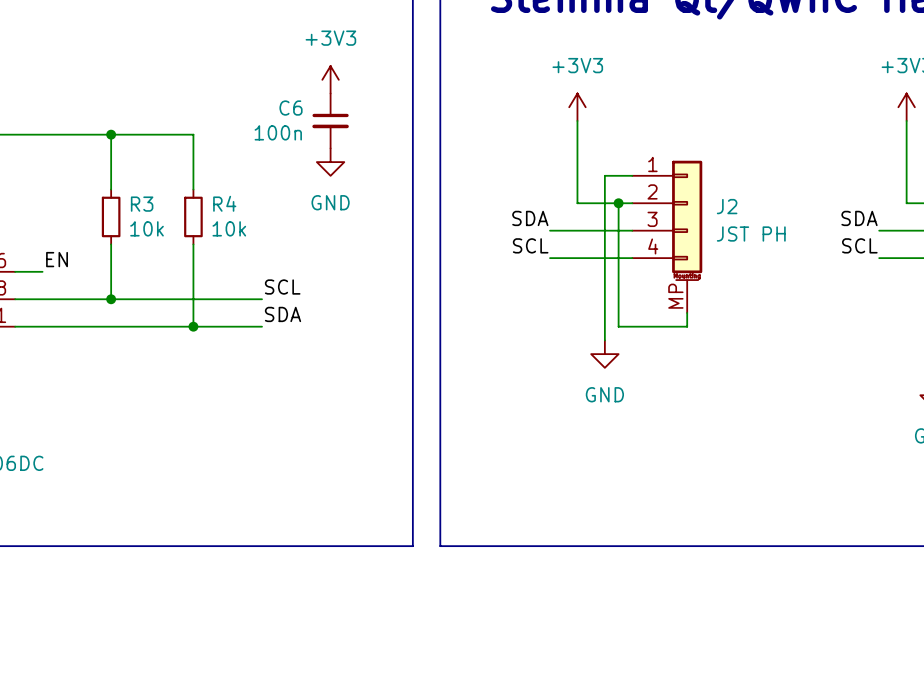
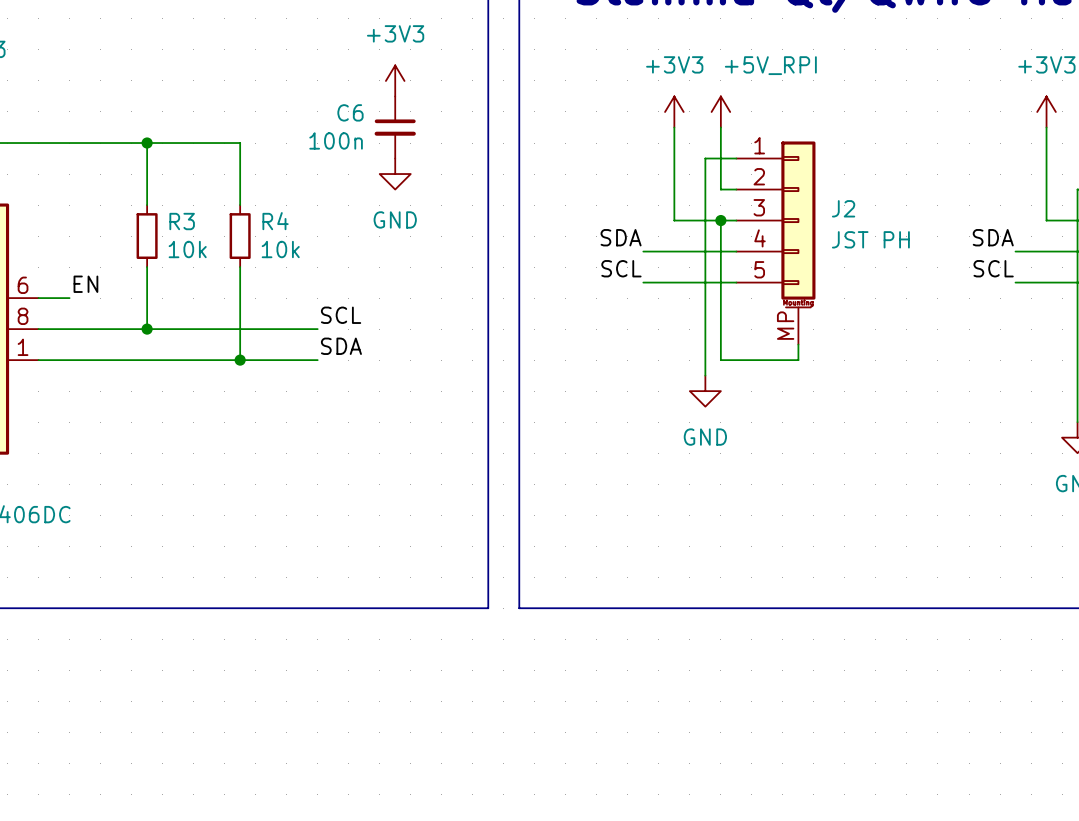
power symbol: none -> +5V_RPI (720, 111)
wire: none -> (720, 127) (720, 189)
J2 symbol: [632, 160, 703, 313] -> [736, 141, 816, 345]
wire: (604, 175) (618, 175) -> (705, 189) (705, 158) (736, 158)

